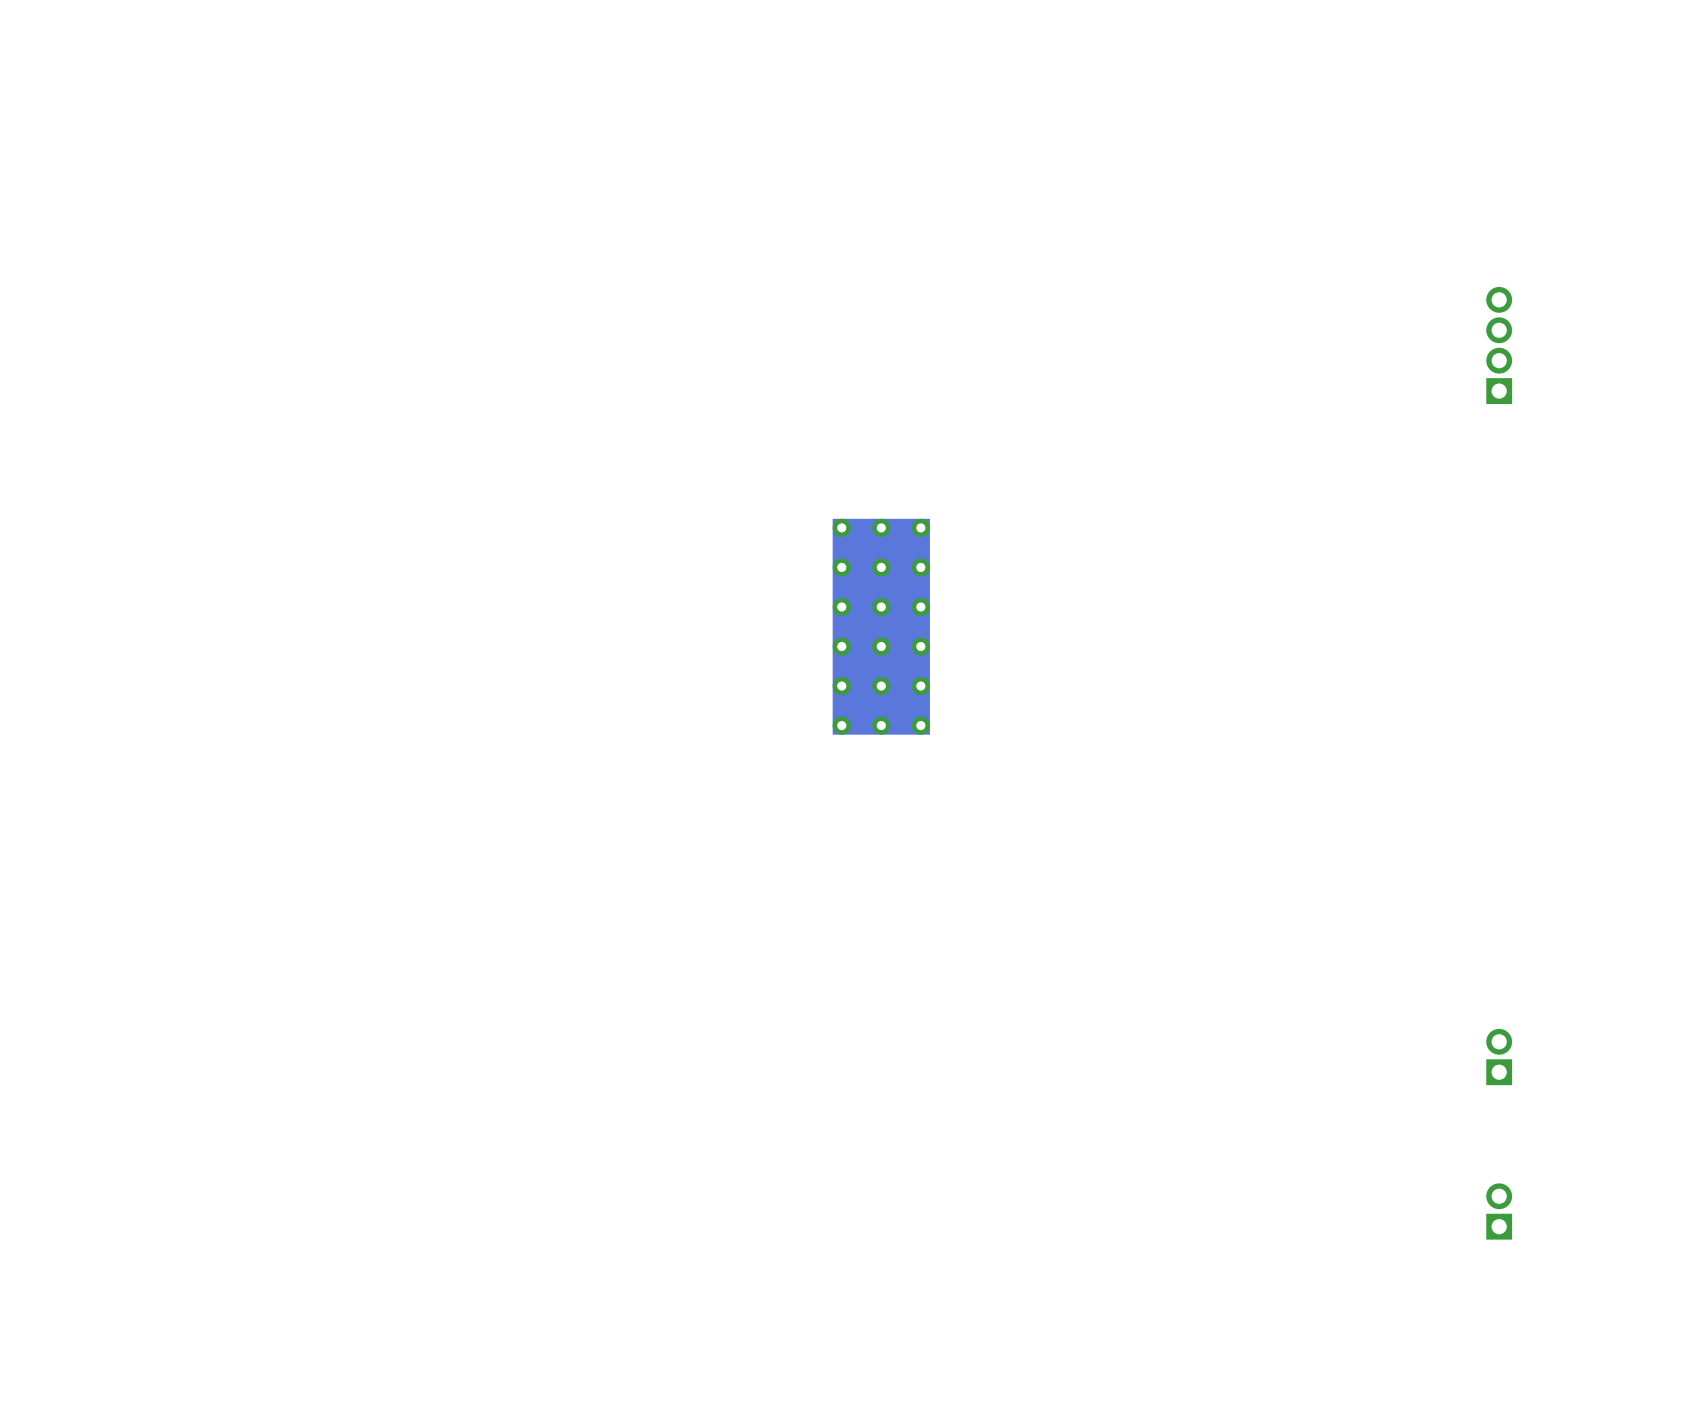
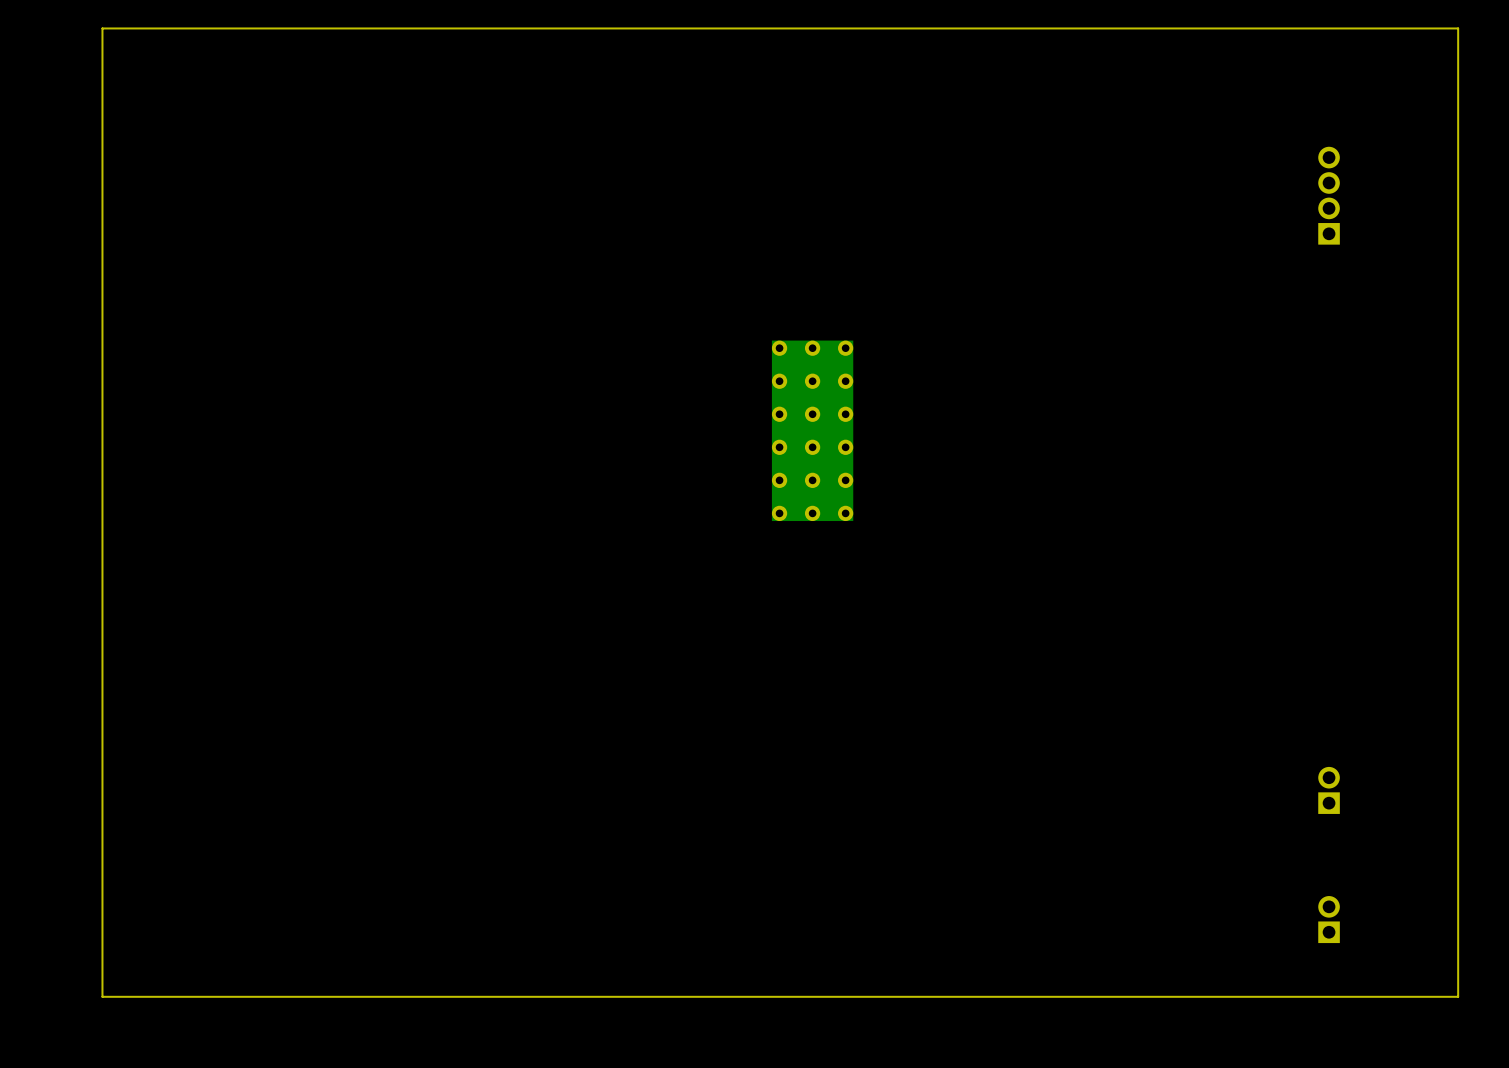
board edge: none -> (1458, 28) (102, 28) (102, 996) (1458, 996) (1458, 28)

